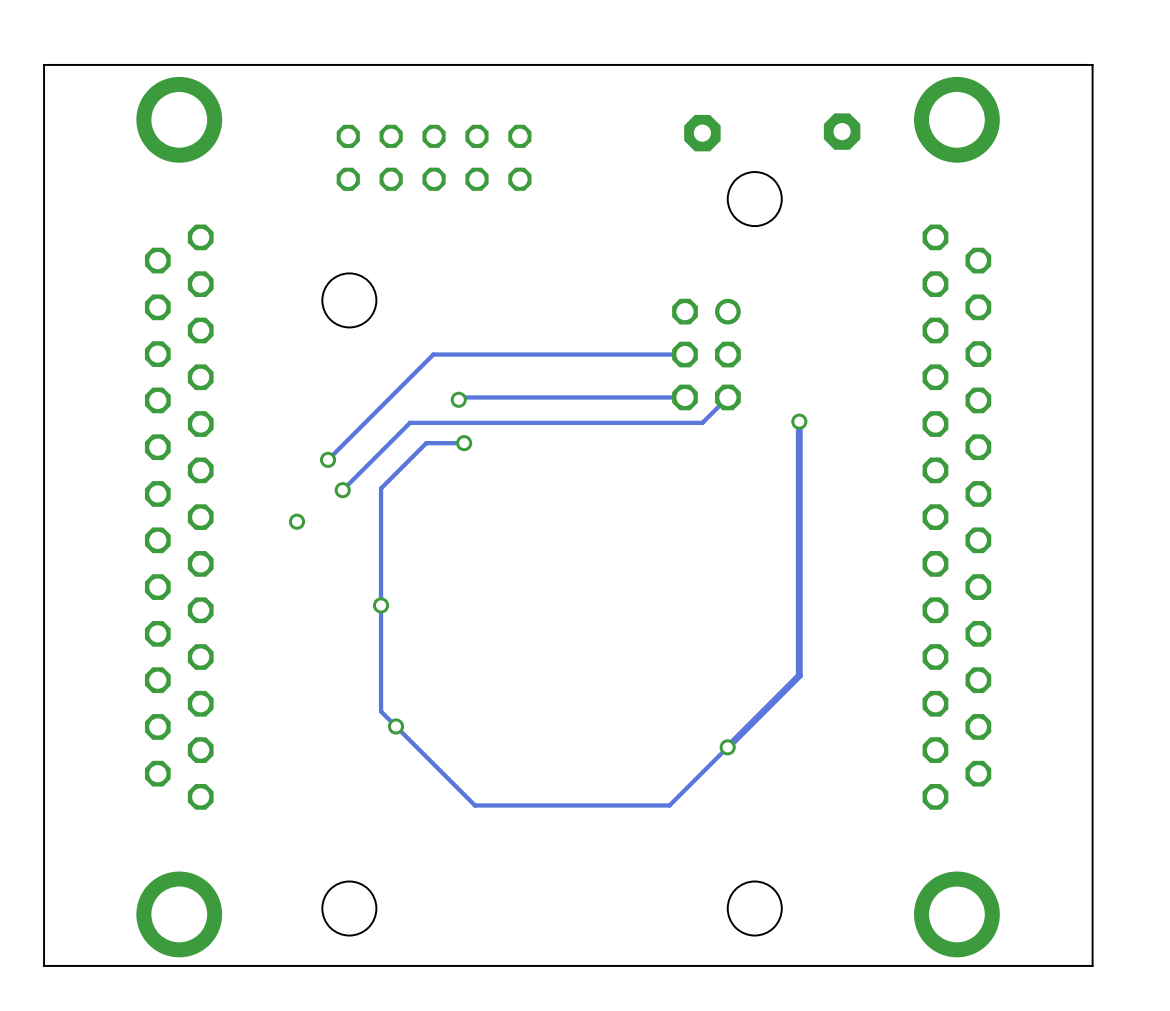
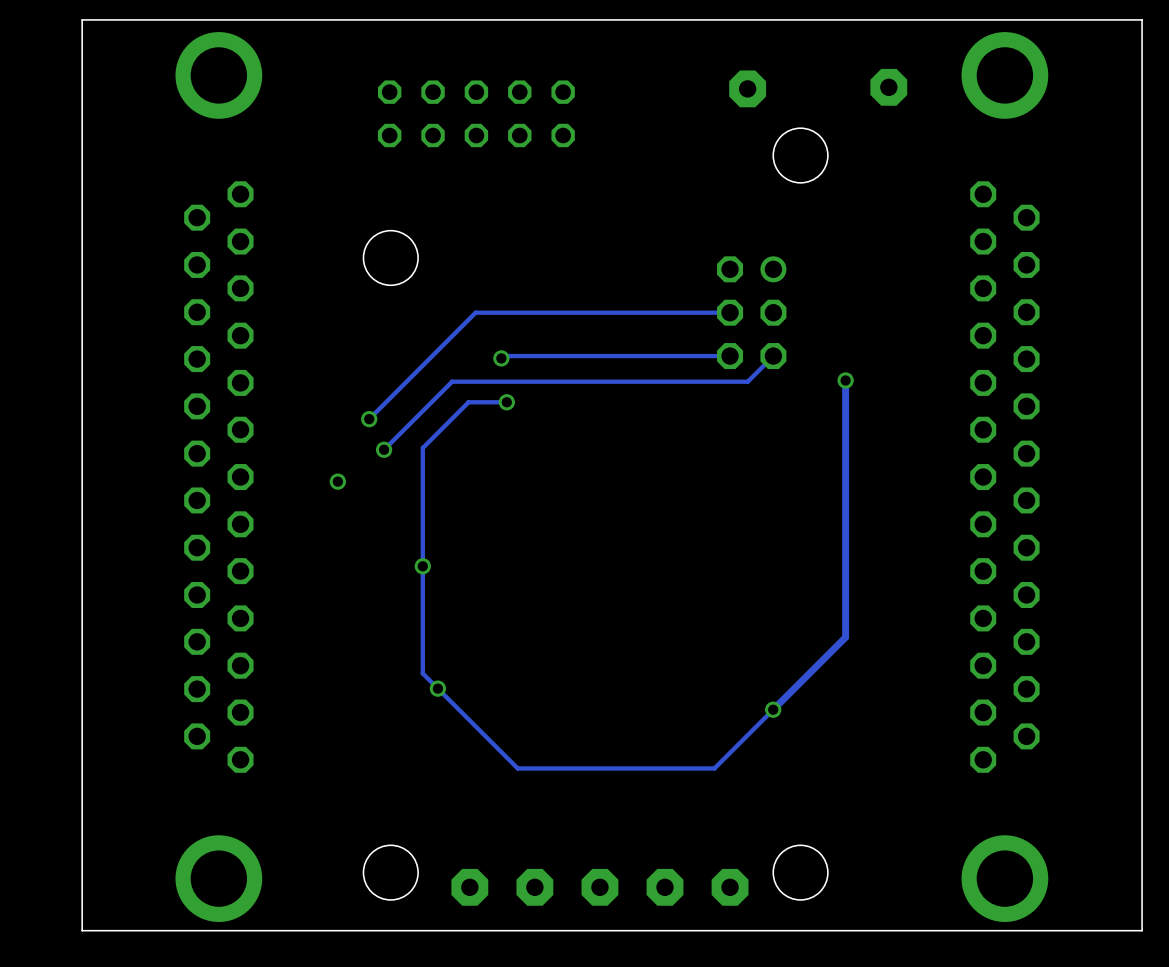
part: none -> (469, 887)
part: none -> (534, 887)
part: none -> (599, 887)
part: none -> (665, 887)
part: none -> (730, 887)

